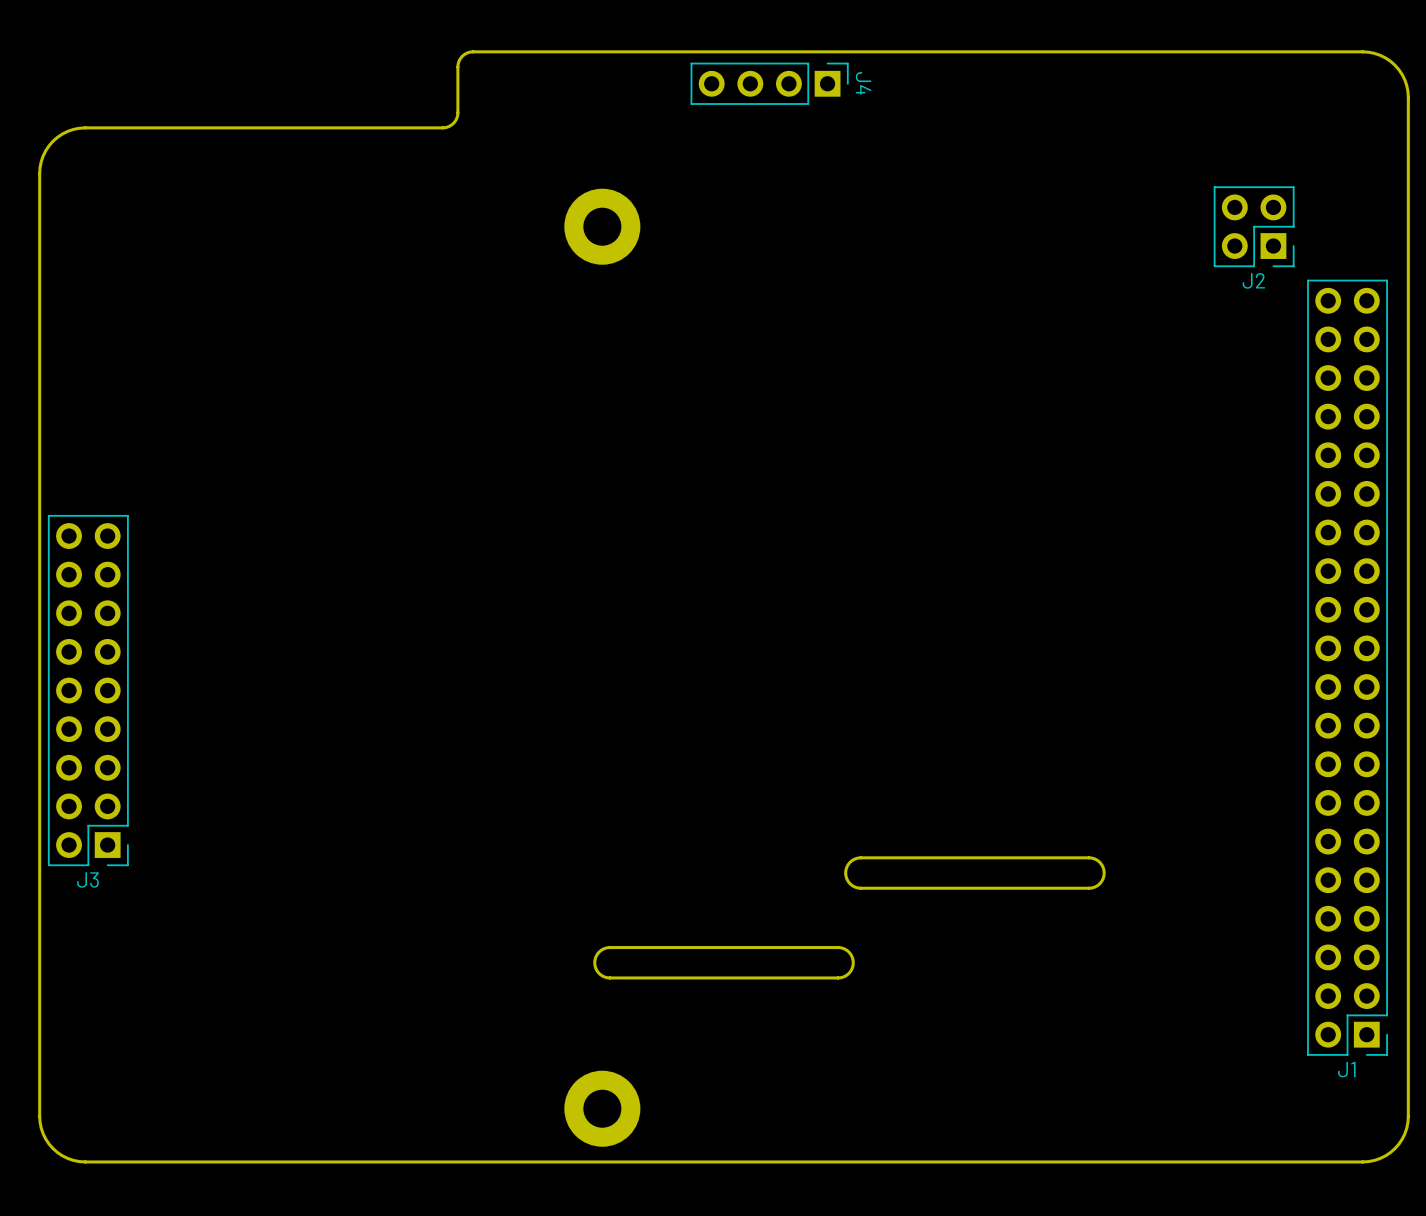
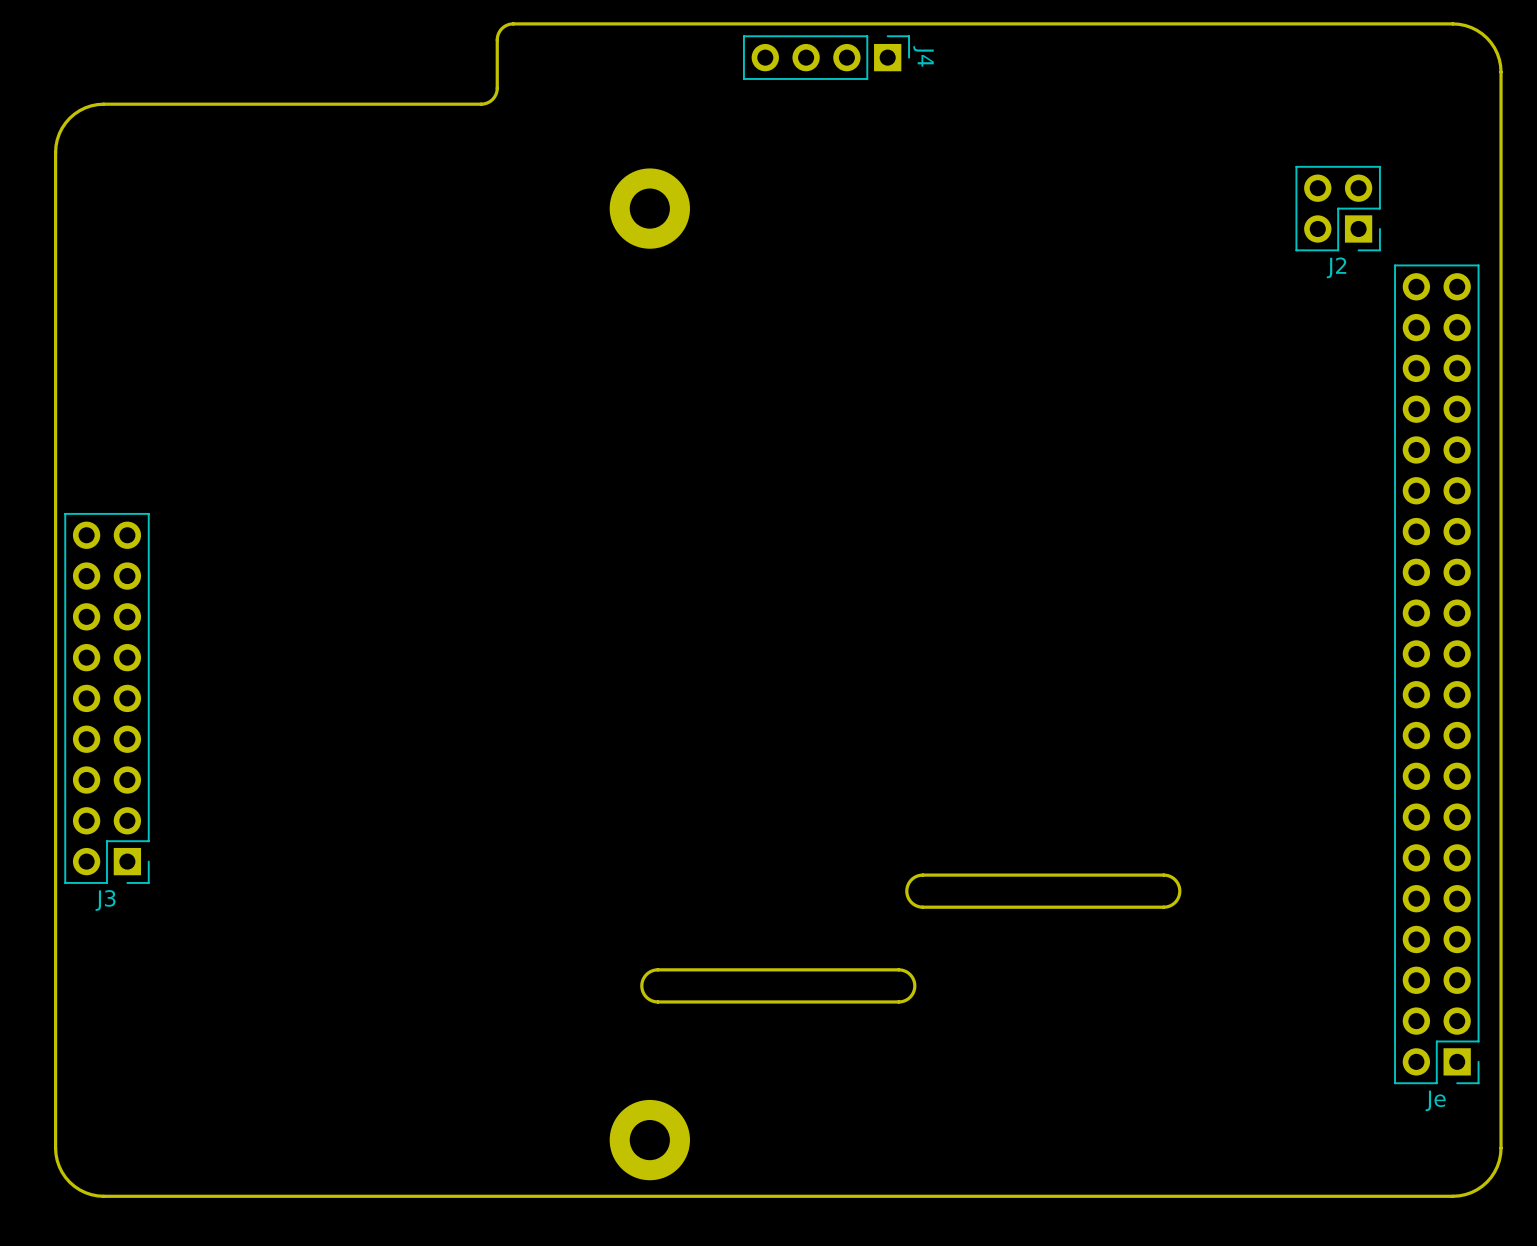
J1 name: J1 (1346, 1069) -> Je (1435, 1100)

